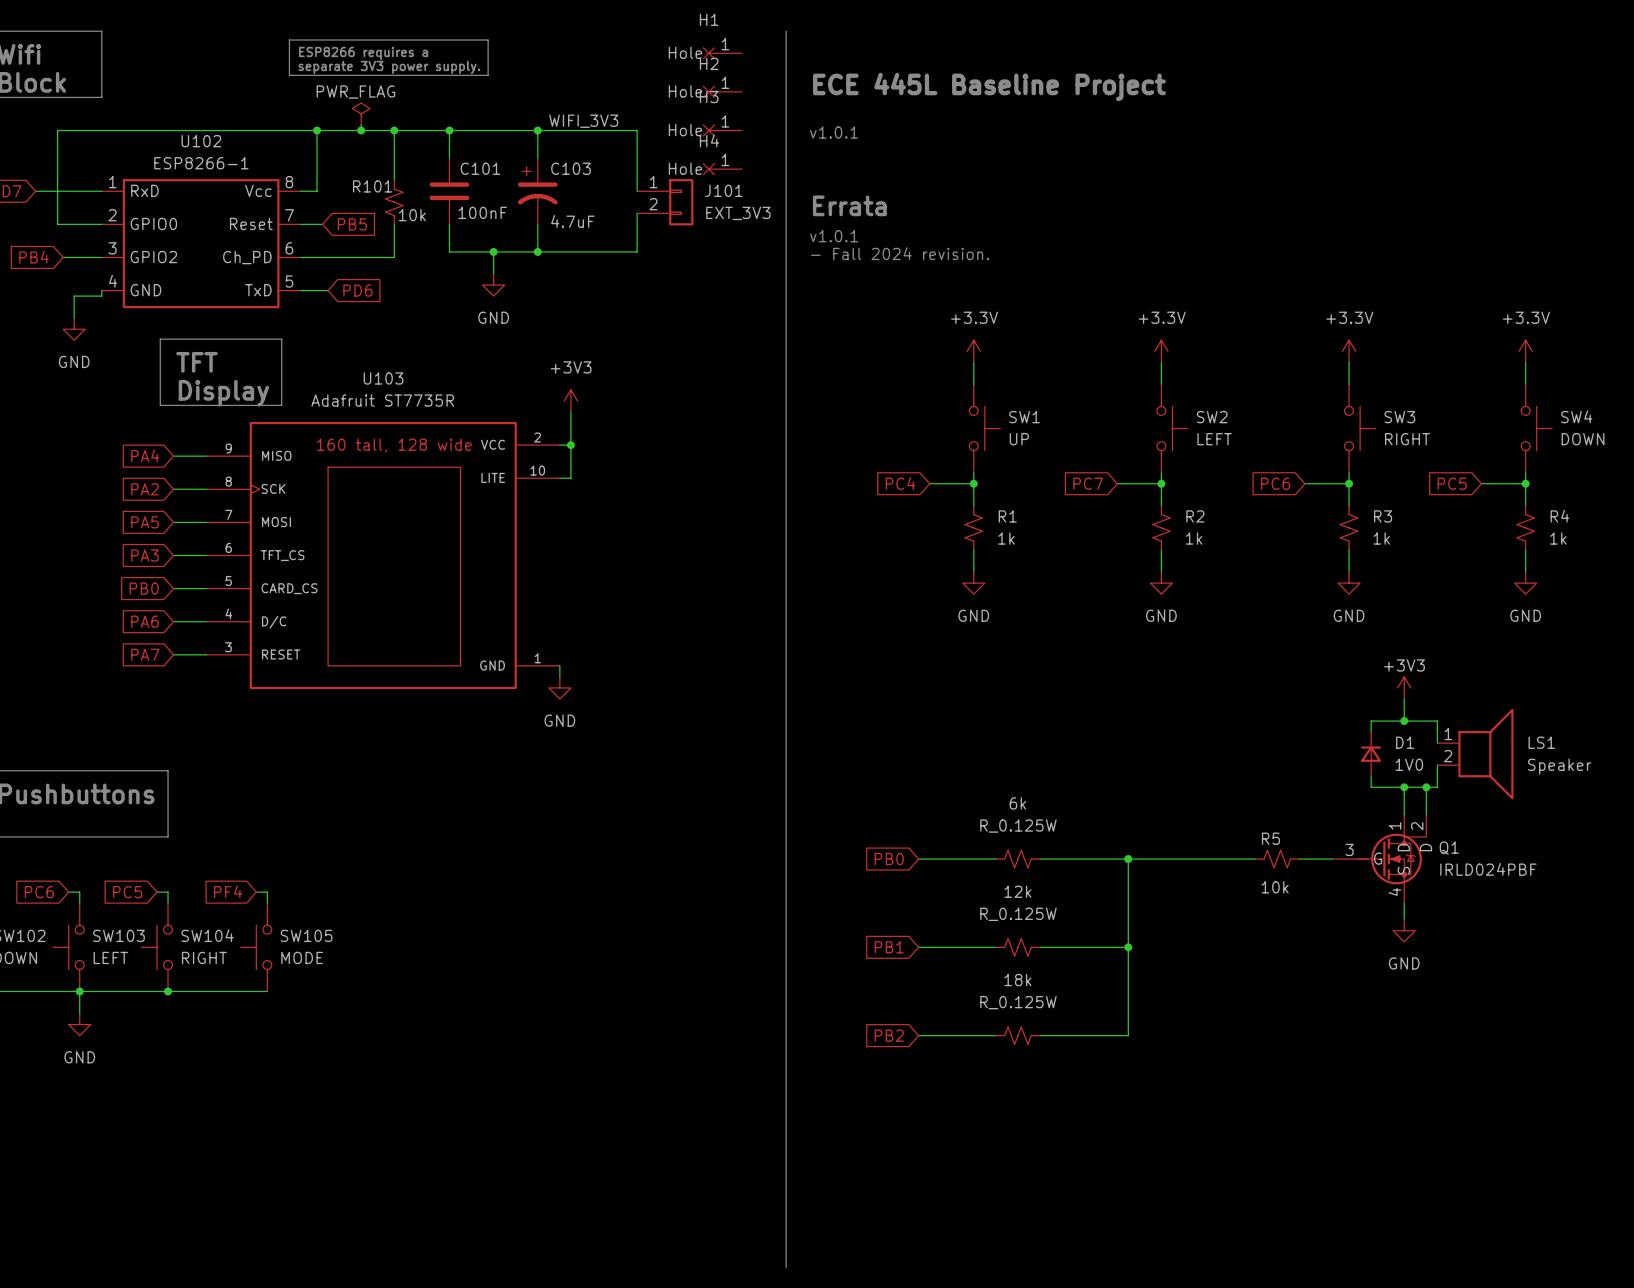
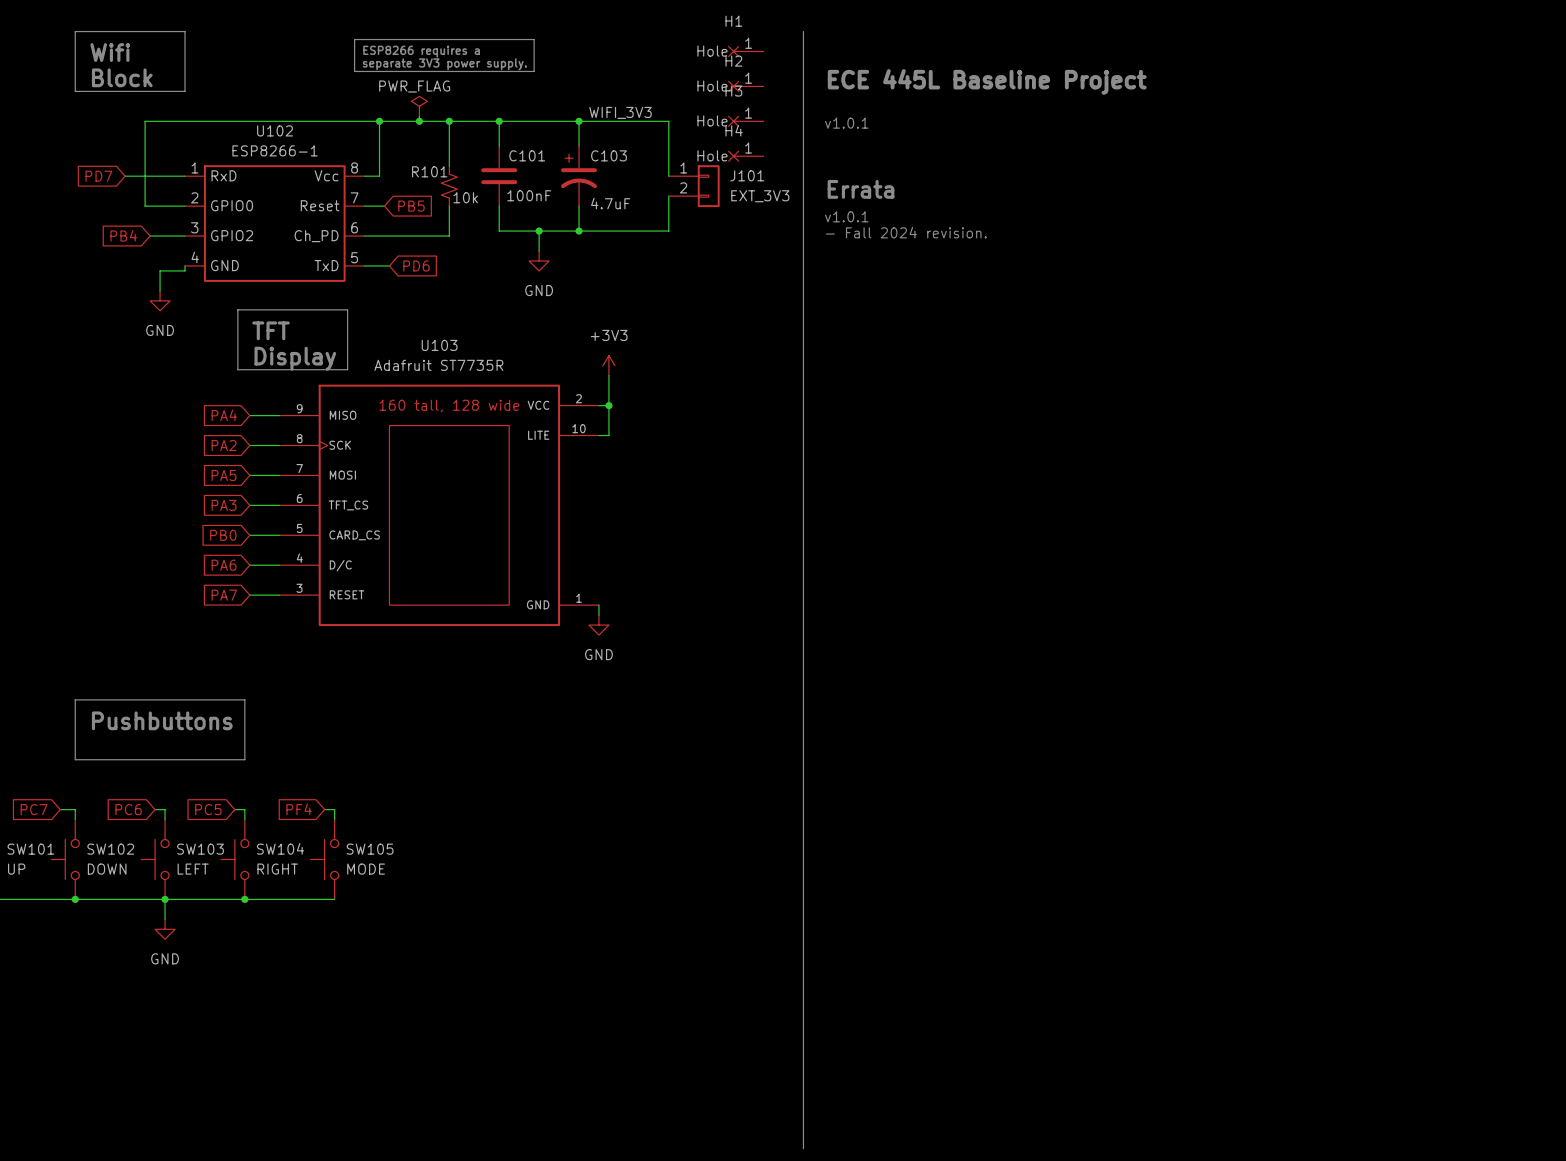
power symbol: +3.3V (973, 351) -> none
power symbol: +3.3V (1161, 351) -> none
power symbol: +3.3V (1349, 351) -> none
power symbol: +3.3V (1525, 351) -> none
wire: (973, 362) (973, 384) -> none
wire: (1161, 362) (1161, 384) -> none
wire: (1349, 362) (1349, 384) -> none
wire: (1525, 362) (1525, 384) -> none
SW1: UP (984, 428) -> none
SW2: LEFT (1172, 428) -> none
SW3: RIGHT (1360, 428) -> none
SW4: DOWN (1536, 428) -> none
wire: (973, 472) (973, 505) -> none
wire: (1161, 472) (1161, 505) -> none
wire: (1349, 472) (1349, 505) -> none
wire: (1525, 472) (1525, 505) -> none
global label: PC4 (900, 483) -> none
wire: (929, 483) (973, 483) -> none
junction: (973, 483) -> none
global label: PC7 (1088, 483) -> none
wire: (1117, 483) (1161, 483) -> none
junction: (1161, 483) -> none
global label: PC6 (1275, 483) -> none
wire: (1304, 483) (1349, 483) -> none
junction: (1349, 483) -> none
global label: PC5 (1452, 483) -> none
wire: (1481, 483) (1525, 483) -> none
junction: (1525, 483) -> none
R1: 1k (973, 527) -> none
R2: 1k (1161, 527) -> none
R3: 1k (1349, 527) -> none
R4: 1k (1525, 527) -> none
wire: (973, 549) (973, 572) -> none
wire: (1161, 549) (1161, 572) -> none
wire: (1349, 549) (1349, 572) -> none
wire: (1525, 549) (1525, 572) -> none
power symbol: GND (973, 583) -> none
power symbol: GND (1161, 583) -> none
power symbol: GND (1349, 583) -> none
power symbol: GND (1525, 583) -> none
power symbol: +3V3 (1404, 687) -> none
wire: (1404, 698) (1404, 721) -> none
junction: (1404, 721) -> none
wire: (1371, 732) (1371, 721) (1437, 721) (1437, 743) -> none
D1: 1V0 (1371, 754) -> none
LS1: Speaker (1475, 754) -> none
wire: (1437, 765) (1437, 787) (1371, 787) (1371, 776) -> none
wire: (1404, 787) (1404, 814) -> none
junction: (1404, 787) -> none
wire: (1426, 787) (1426, 814) -> none
junction: (1426, 787) -> none
global label: PB0 (889, 859) -> none
wire: (918, 859) (995, 859) -> none
6k: R_0.125W (1017, 859) -> none
wire: (1040, 859) (1255, 859) -> none
wire: (1128, 859) (1128, 1035) (1040, 1035) -> none
junction: (1128, 859) -> none
R5: 10k (1277, 859) -> none
wire: (1299, 859) (1332, 859) -> none
Q1: IRLD024PBF (1379, 859) -> none
wire: (1404, 903) (1404, 919) -> none
power symbol: GND (1404, 930) -> none
global label: PB1 (889, 947) -> none
wire: (918, 947) (995, 947) -> none
12k: R_0.125W (1017, 947) -> none
wire: (1040, 947) (1128, 947) -> none
junction: (1128, 947) -> none
global label: PB2 (889, 1035) -> none
wire: (918, 1035) (995, 1035) -> none
18k: R_0.125W (1017, 1035) -> none

